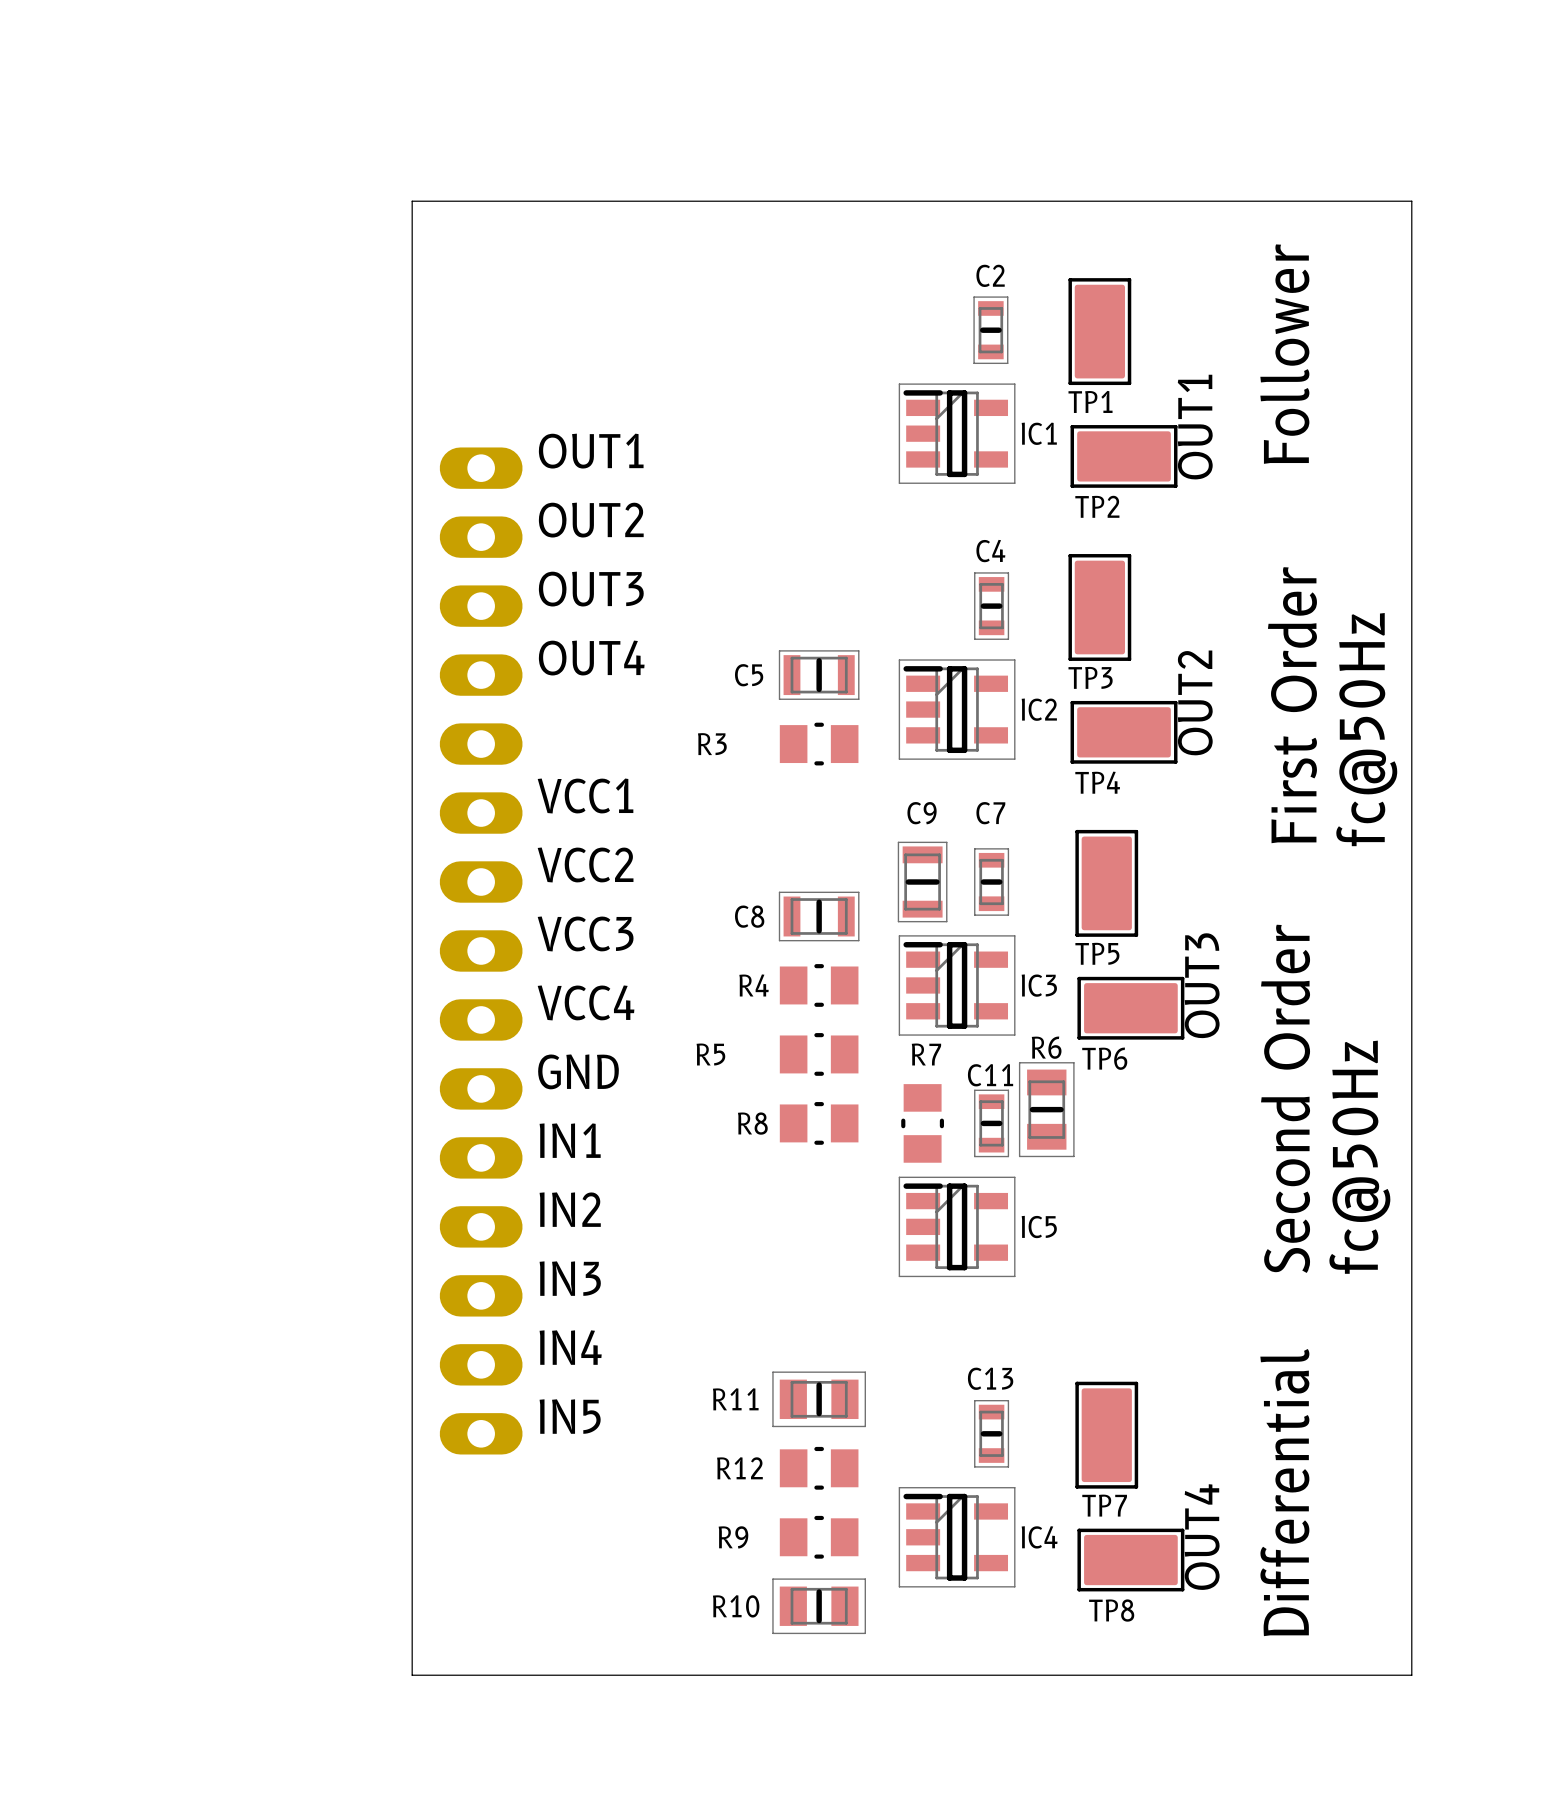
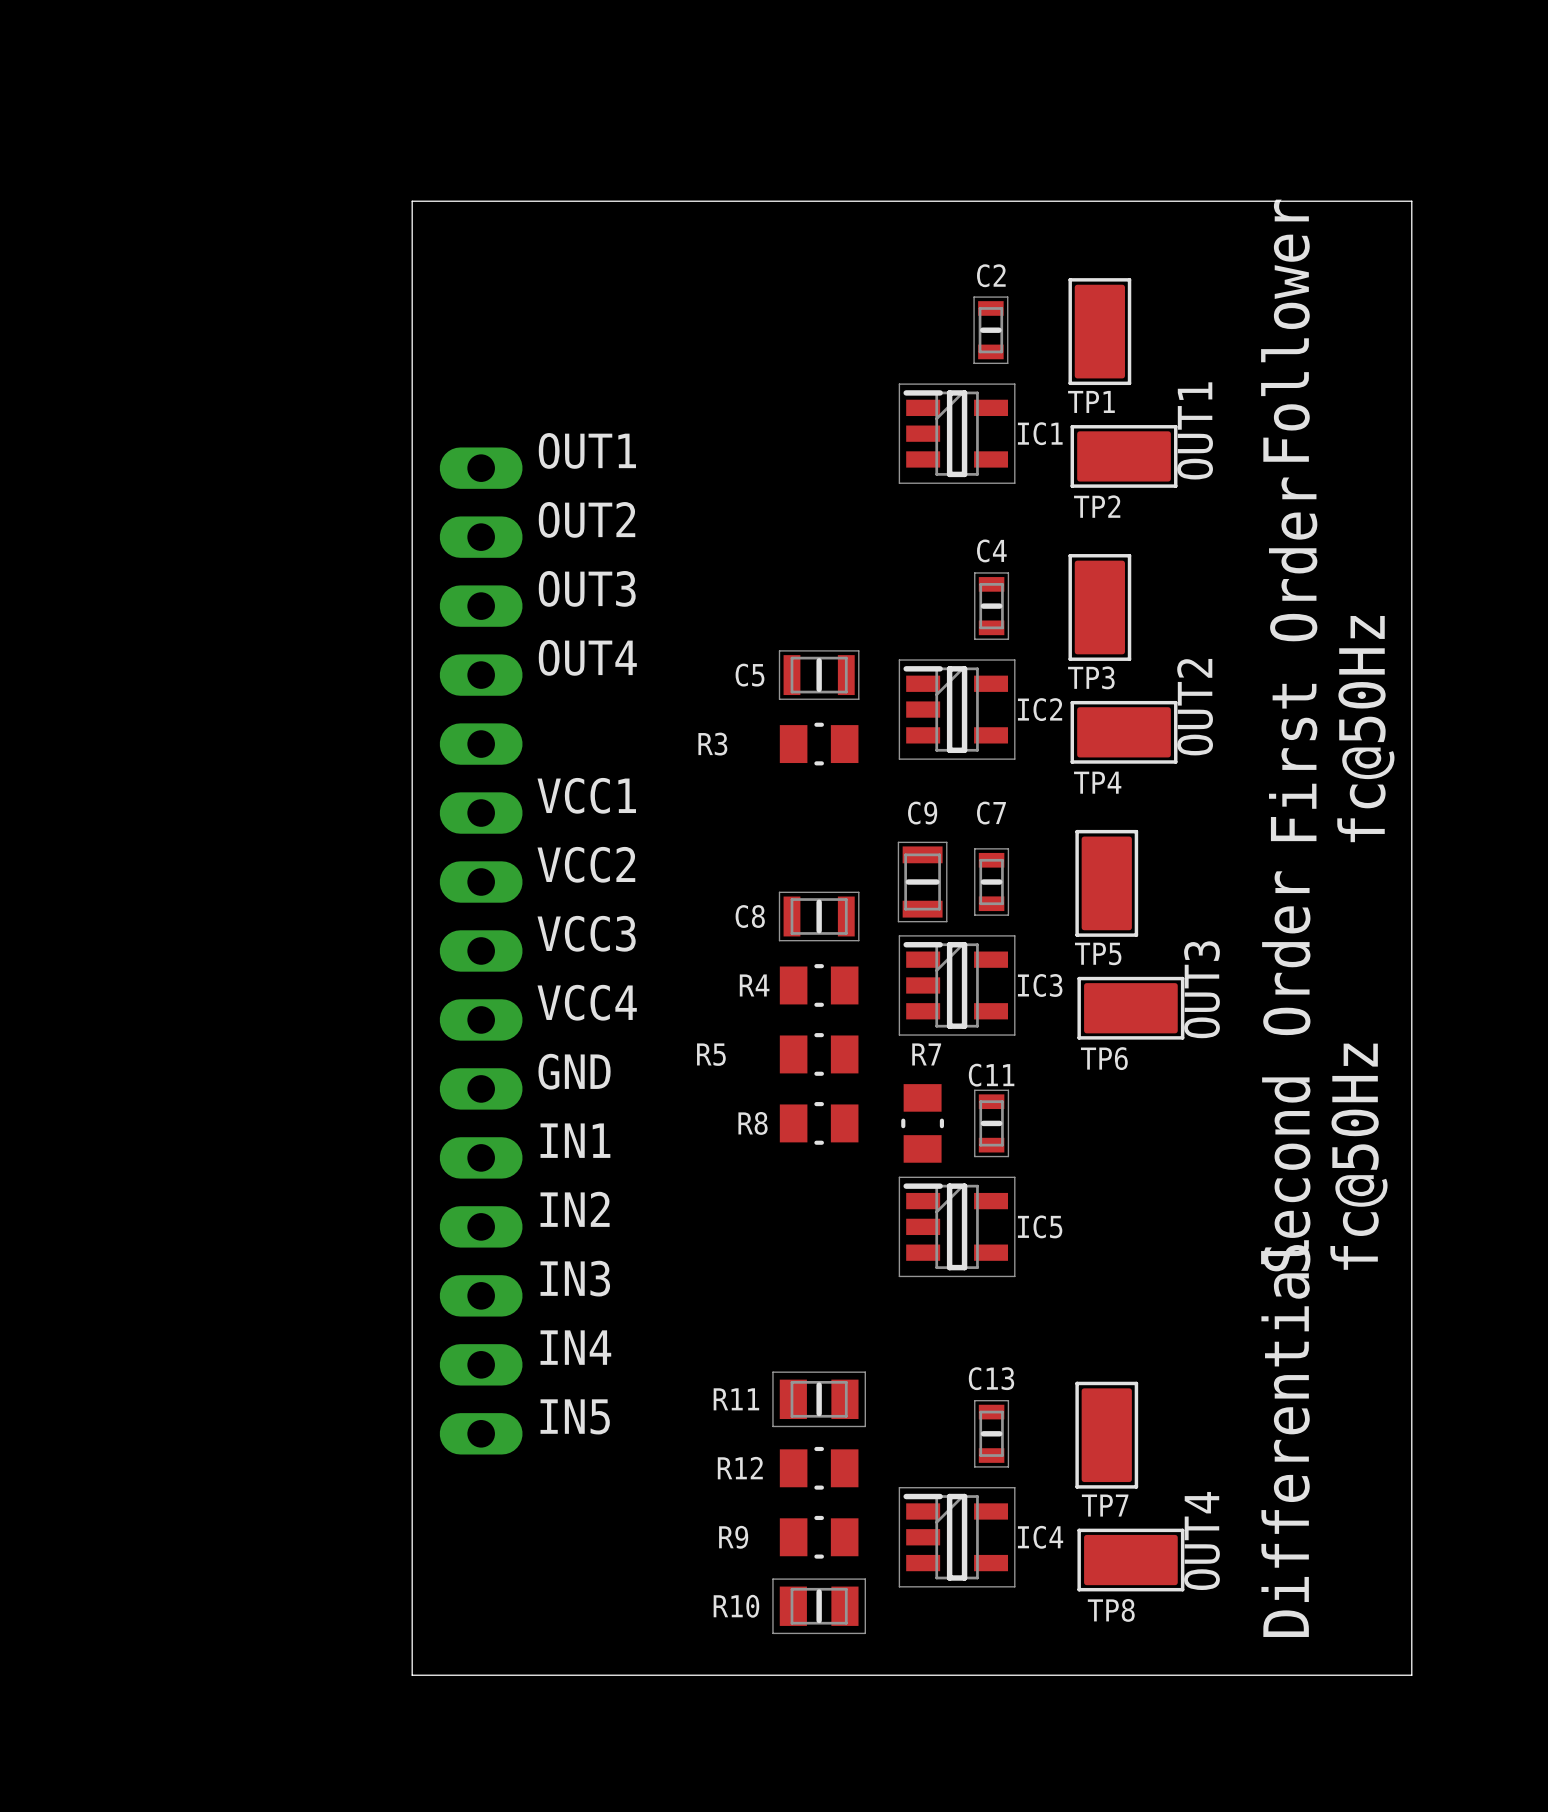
R6: (1046, 1109) -> none

